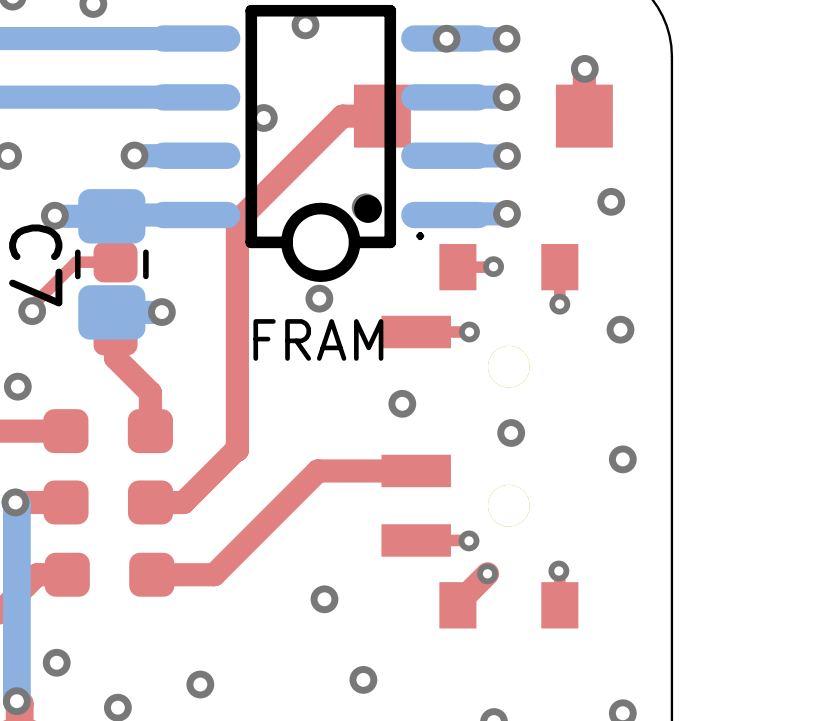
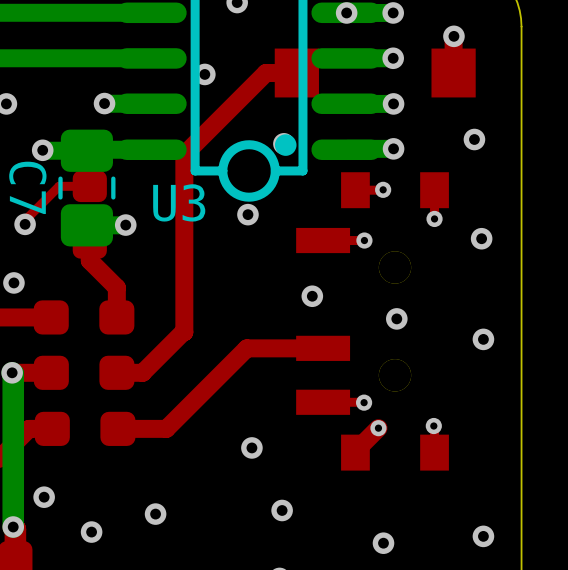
text: . (420, 236) -> none
U3 name: none -> U3 (179, 202)
text: FRAM (318, 339) -> none

